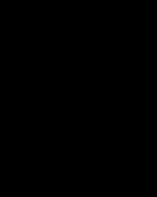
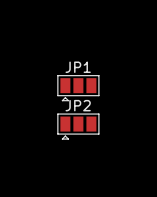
JP1: none -> (78, 88)
JP2: none -> (78, 126)

